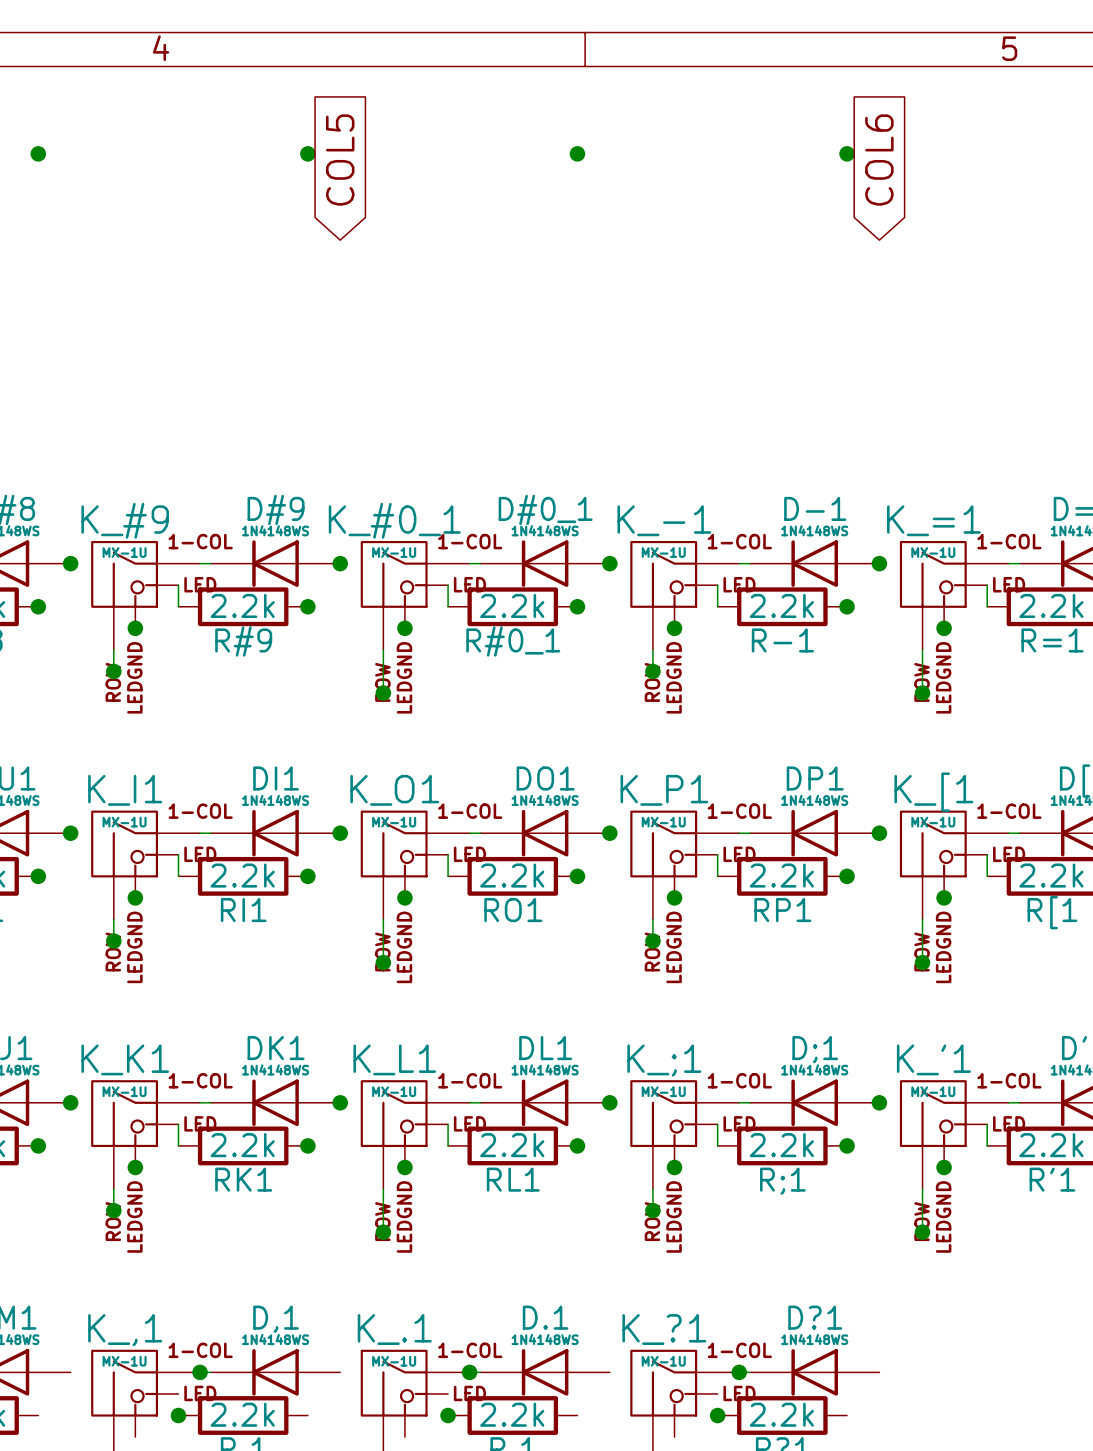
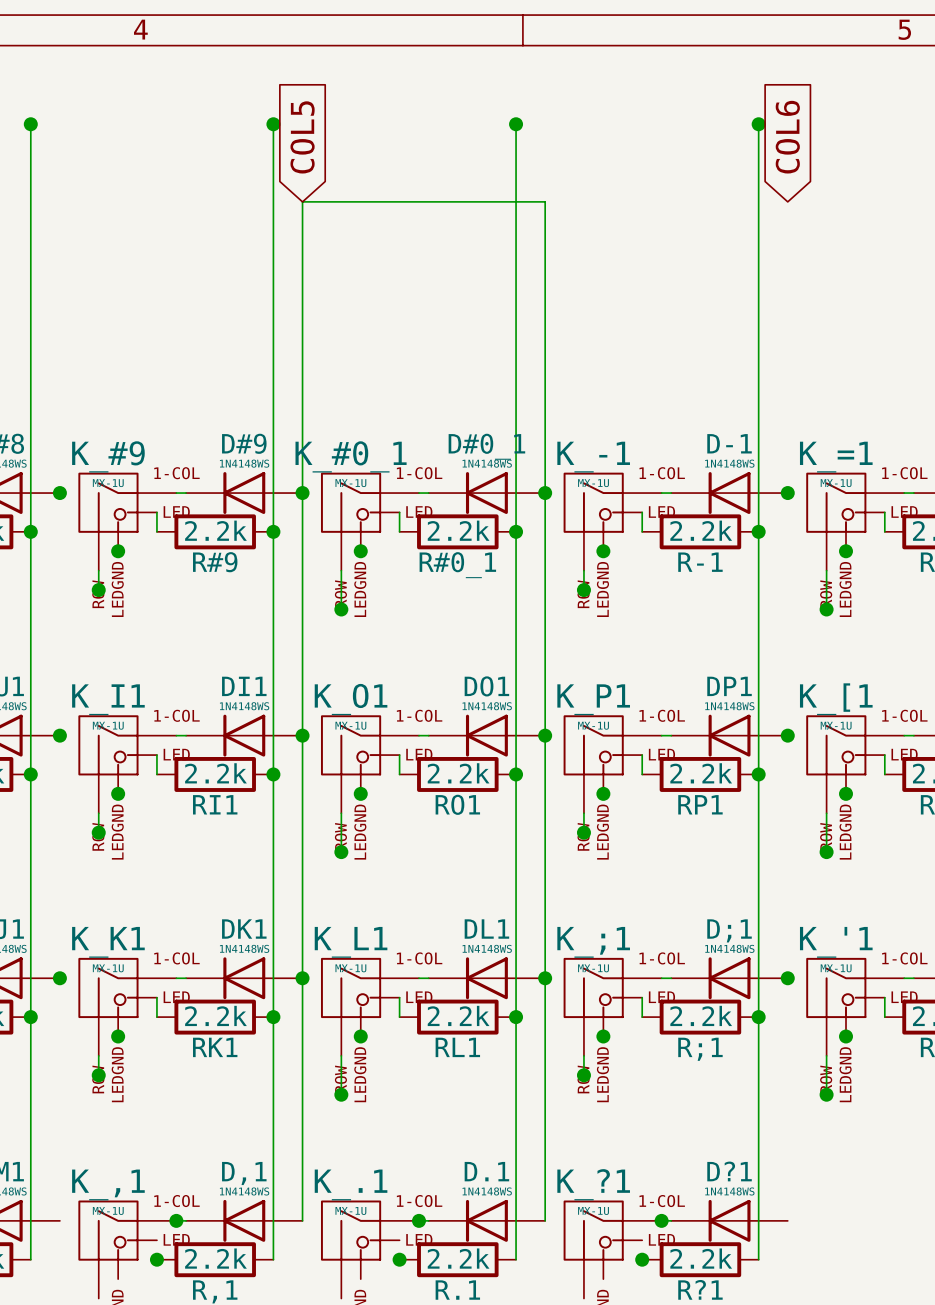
wire: none -> (30, 124) (30, 1259)
wire: none -> (273, 124) (273, 1259)
wire: none -> (516, 124) (516, 1259)
wire: none -> (758, 124) (758, 1259)
wire: none -> (302, 1220) (302, 201) (545, 201) (545, 1220)

